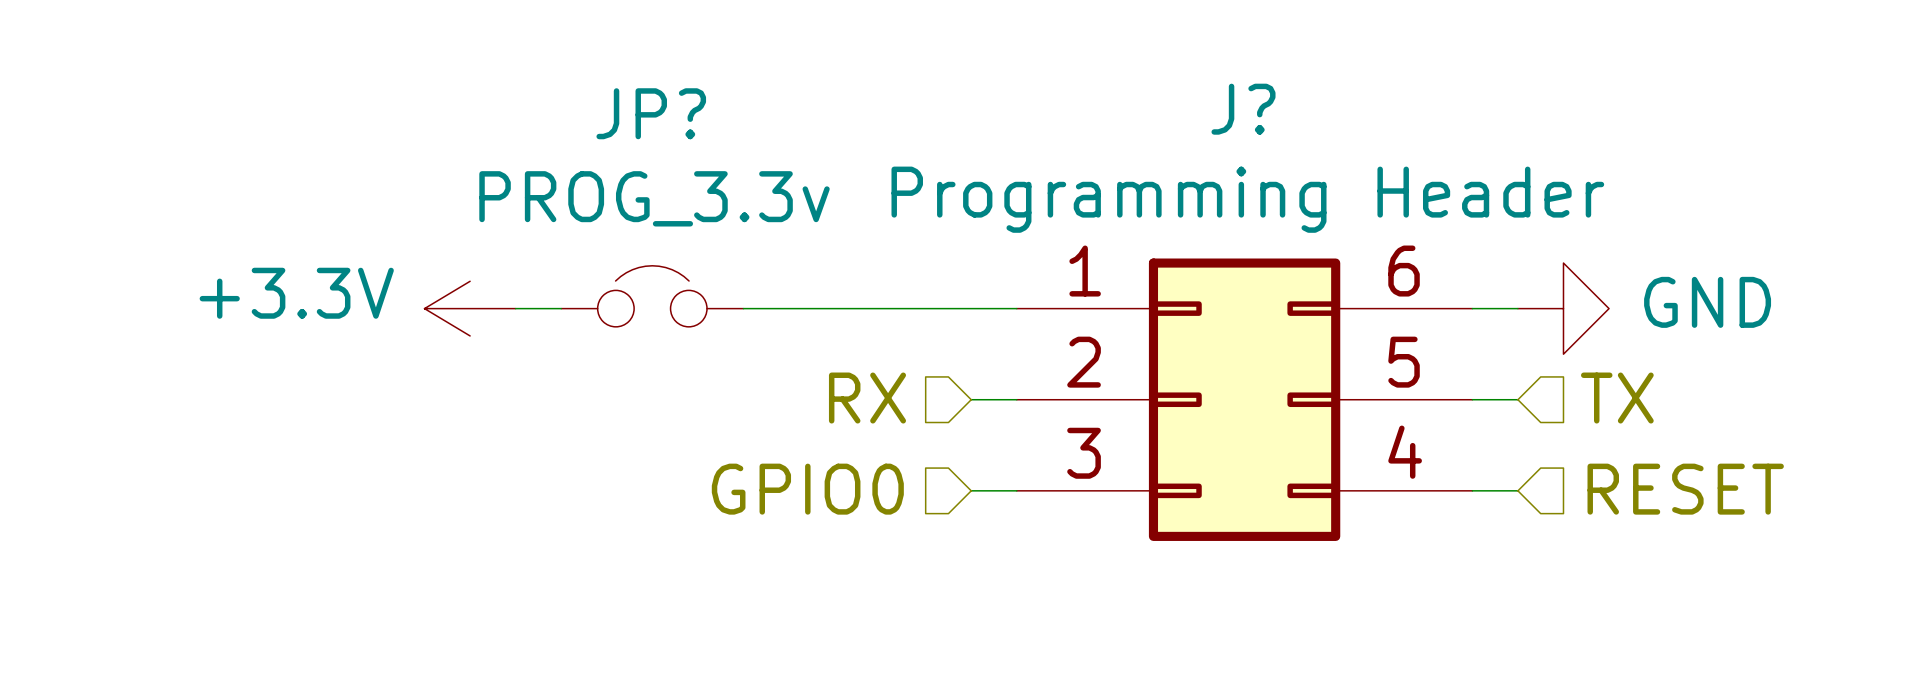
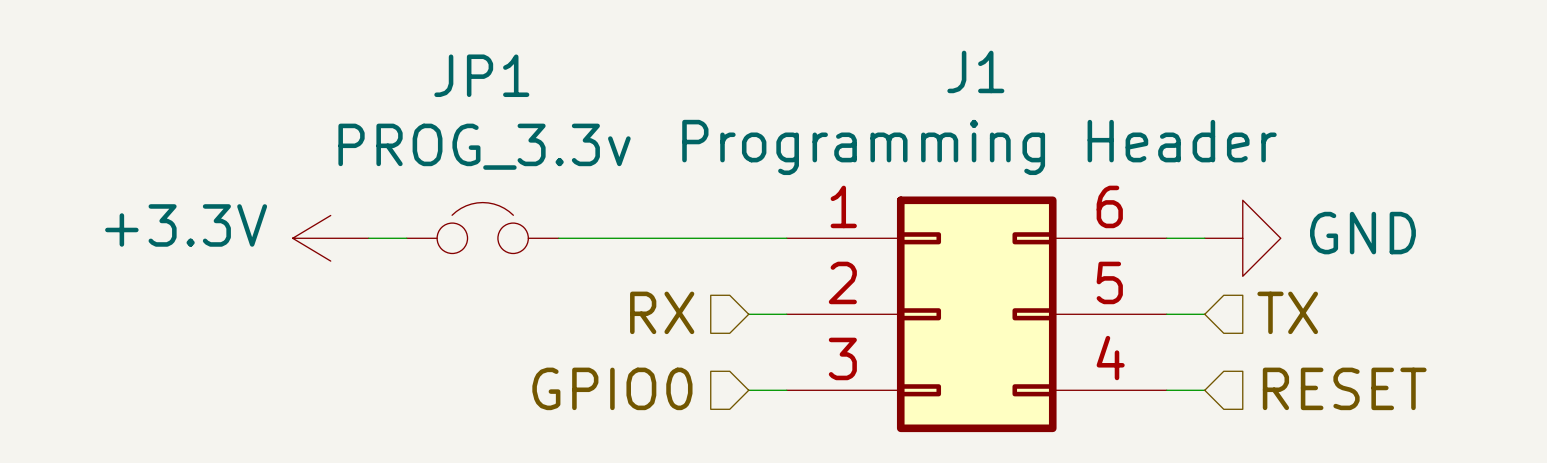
J? name: J? (1243, 109) -> J1 (975, 71)
JP? name: JP? (651, 113) -> JP1 (481, 75)

